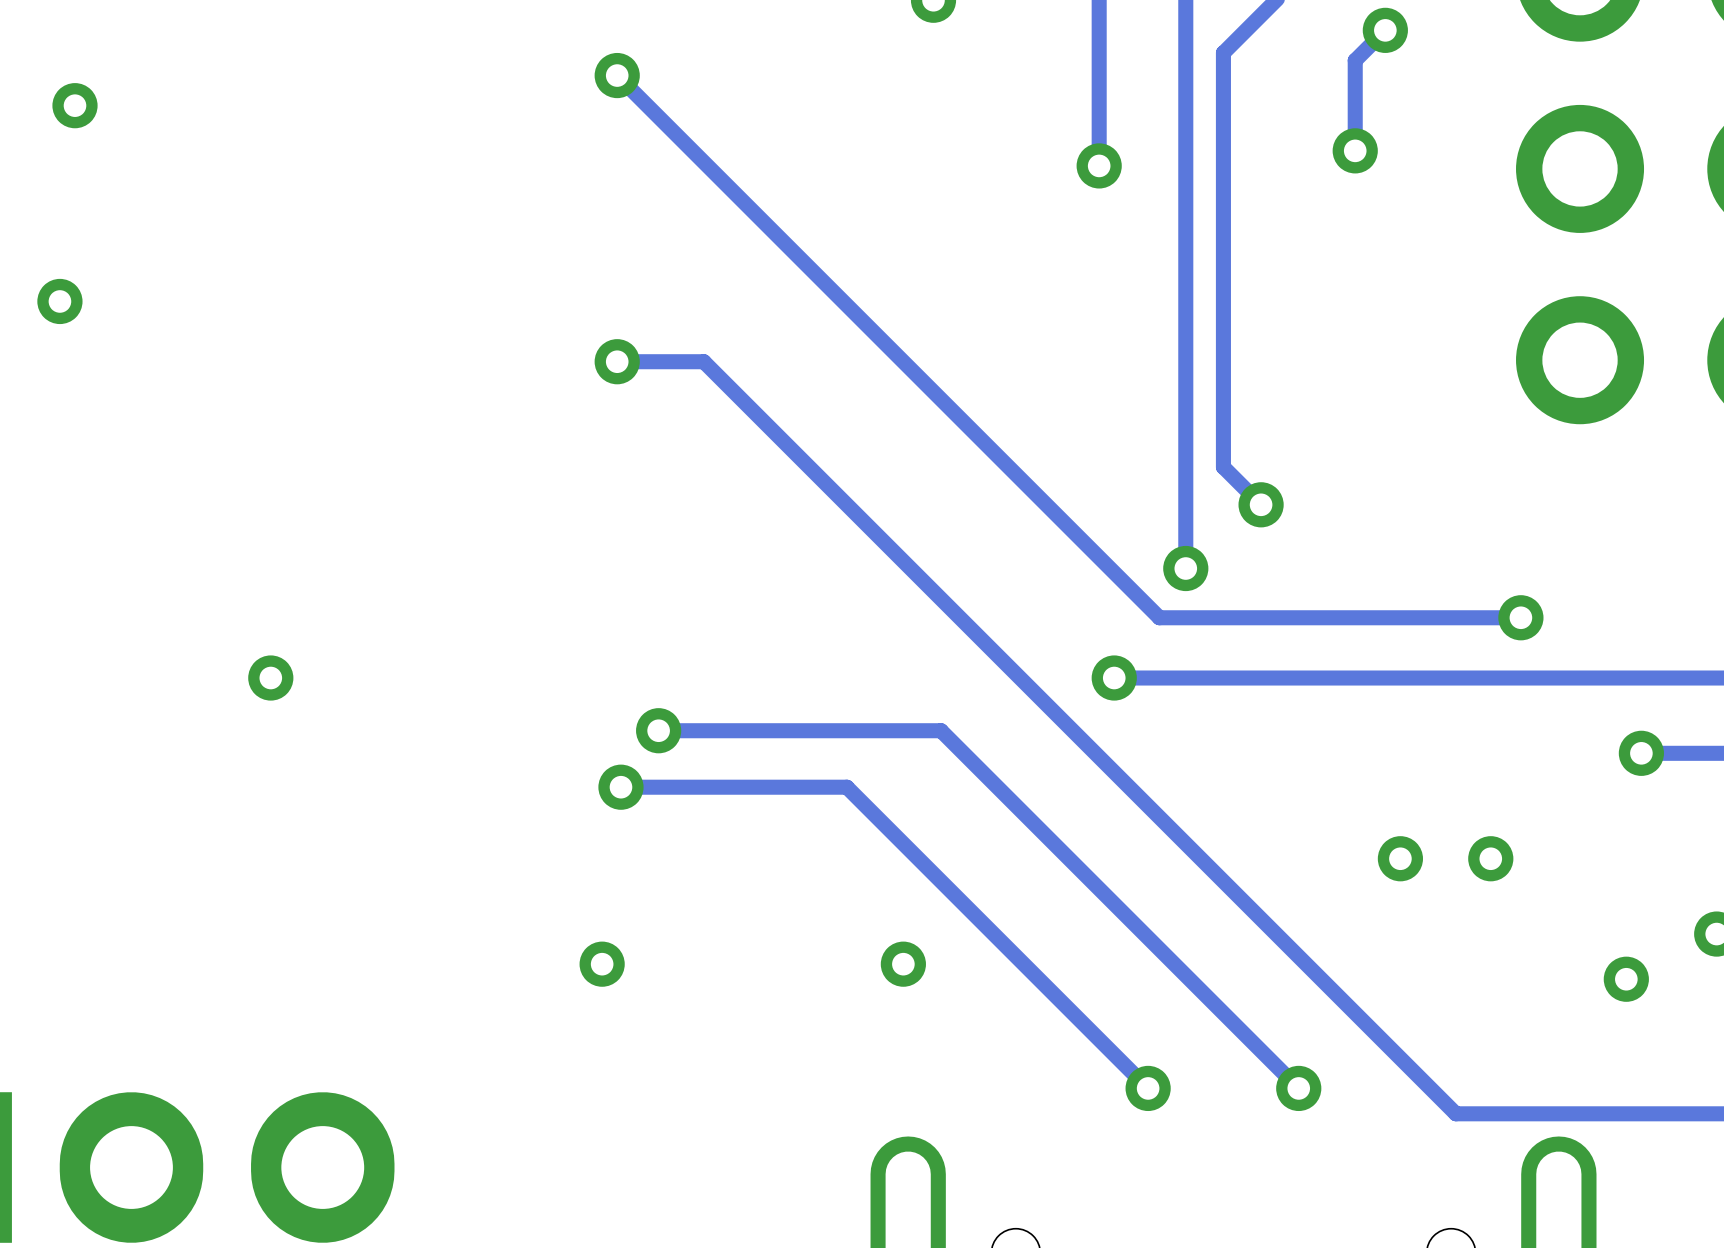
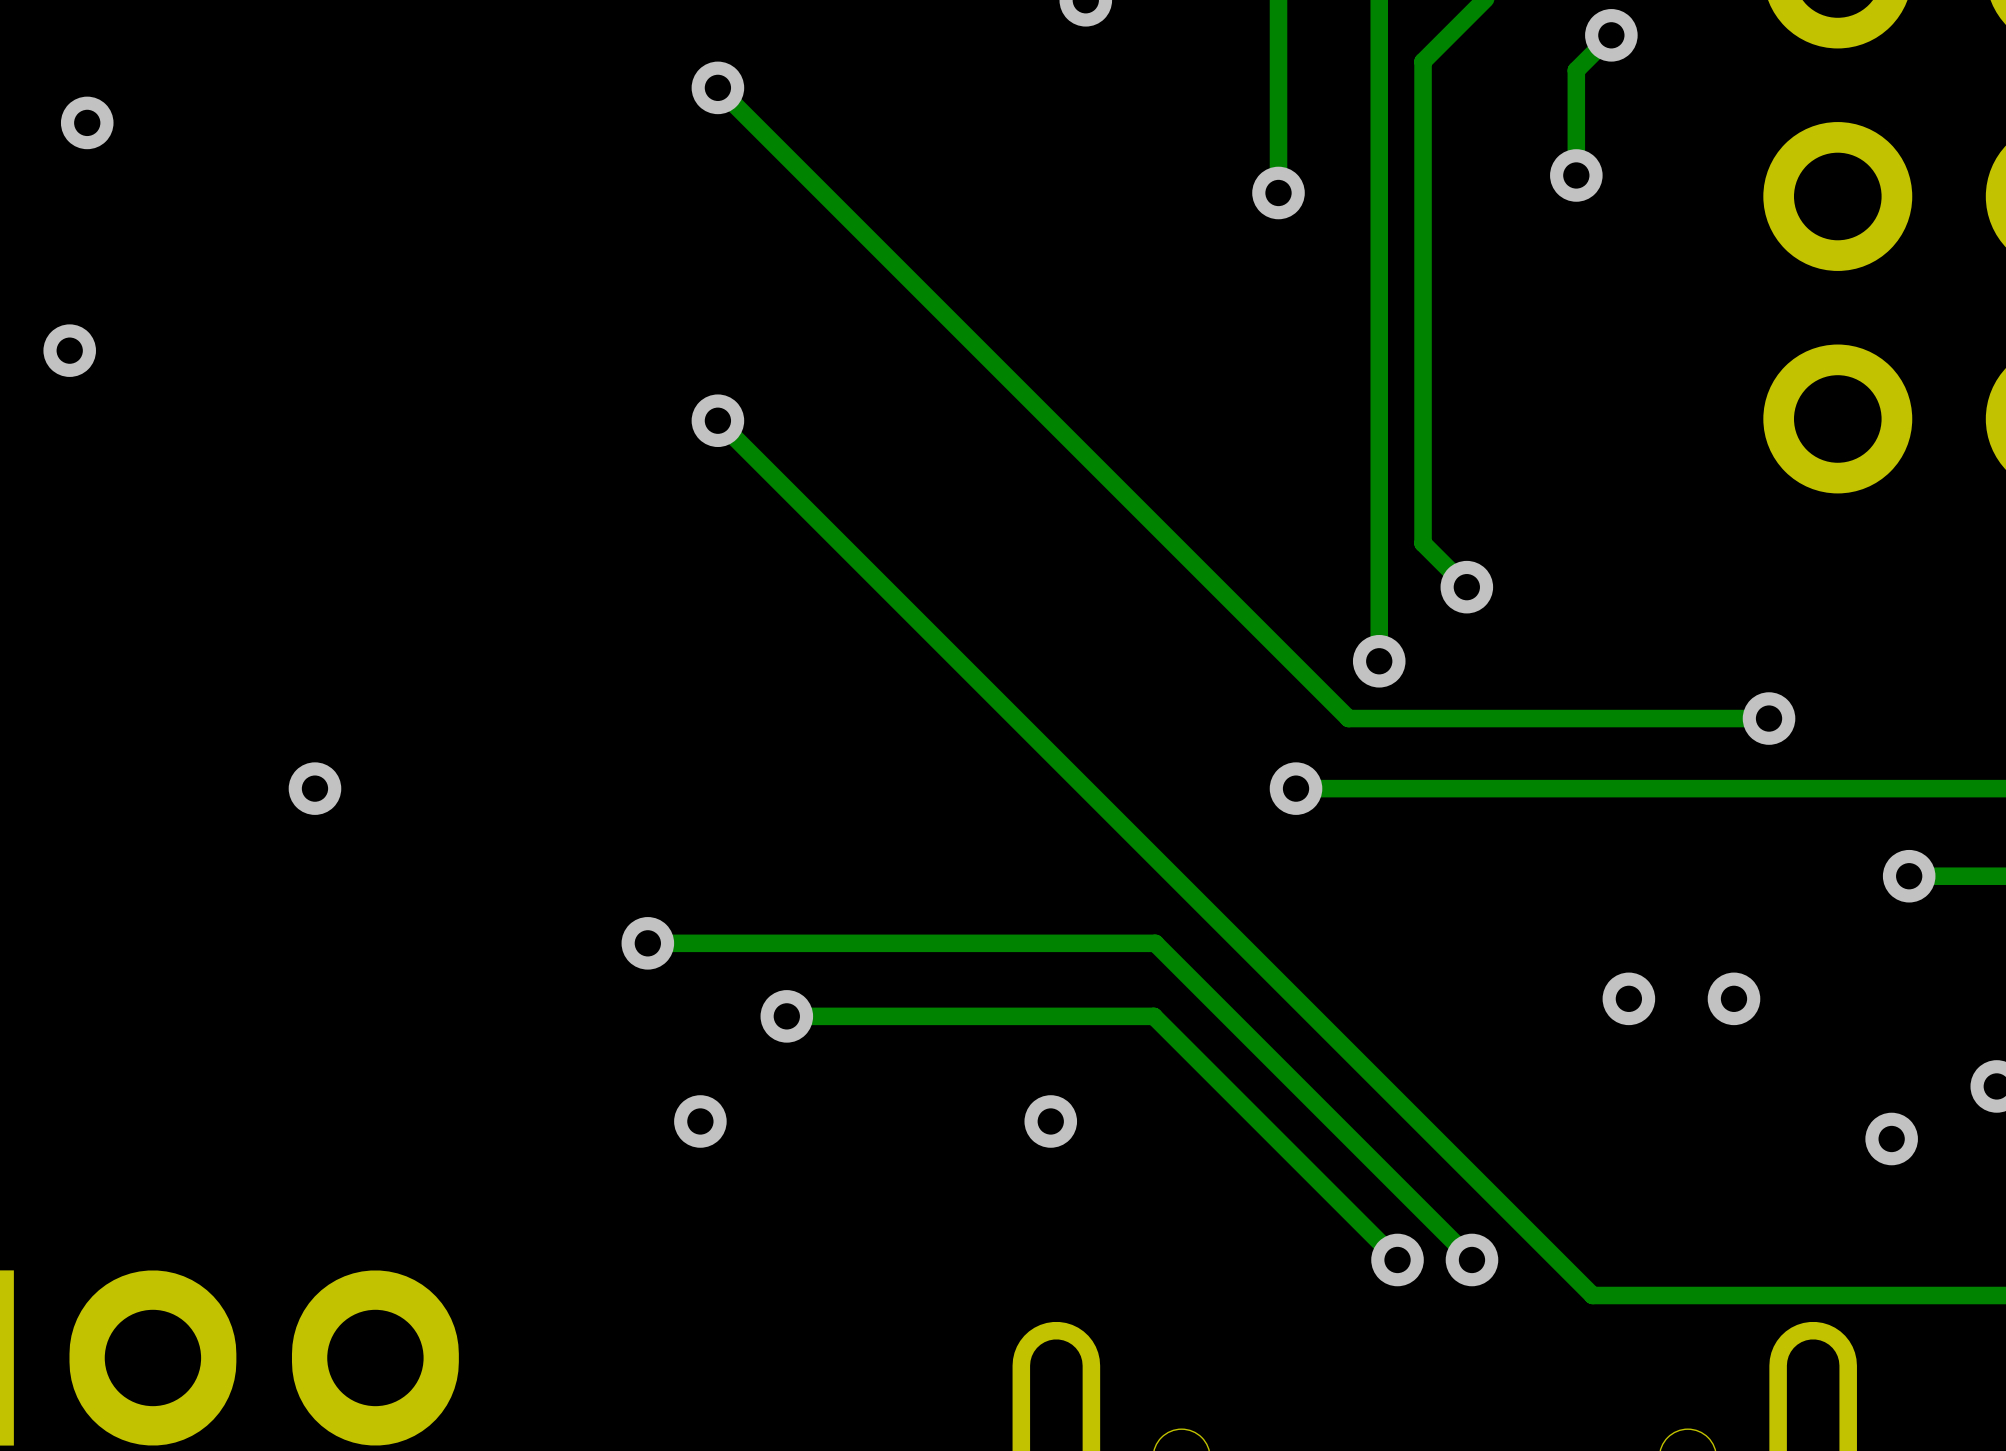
track: (617, 361) (703, 361) (1455, 1113) -> (717, 420) (1592, 1295) (1693, 1295)
track: (658, 730) (941, 730) (1298, 1088) -> none
via: (658, 730) -> none
track: (620, 787) (846, 787) (1148, 1088) -> none
via: (620, 787) -> none
track: none -> (647, 943) (1155, 943) (1471, 1259)
via: none -> (647, 943)
track: none -> (786, 1016) (1153, 1016) (1397, 1259)
via: none -> (786, 1016)
via: none -> (1397, 1259)
via: (1148, 1088) -> none
via position: (1298, 1088) -> (1471, 1259)

